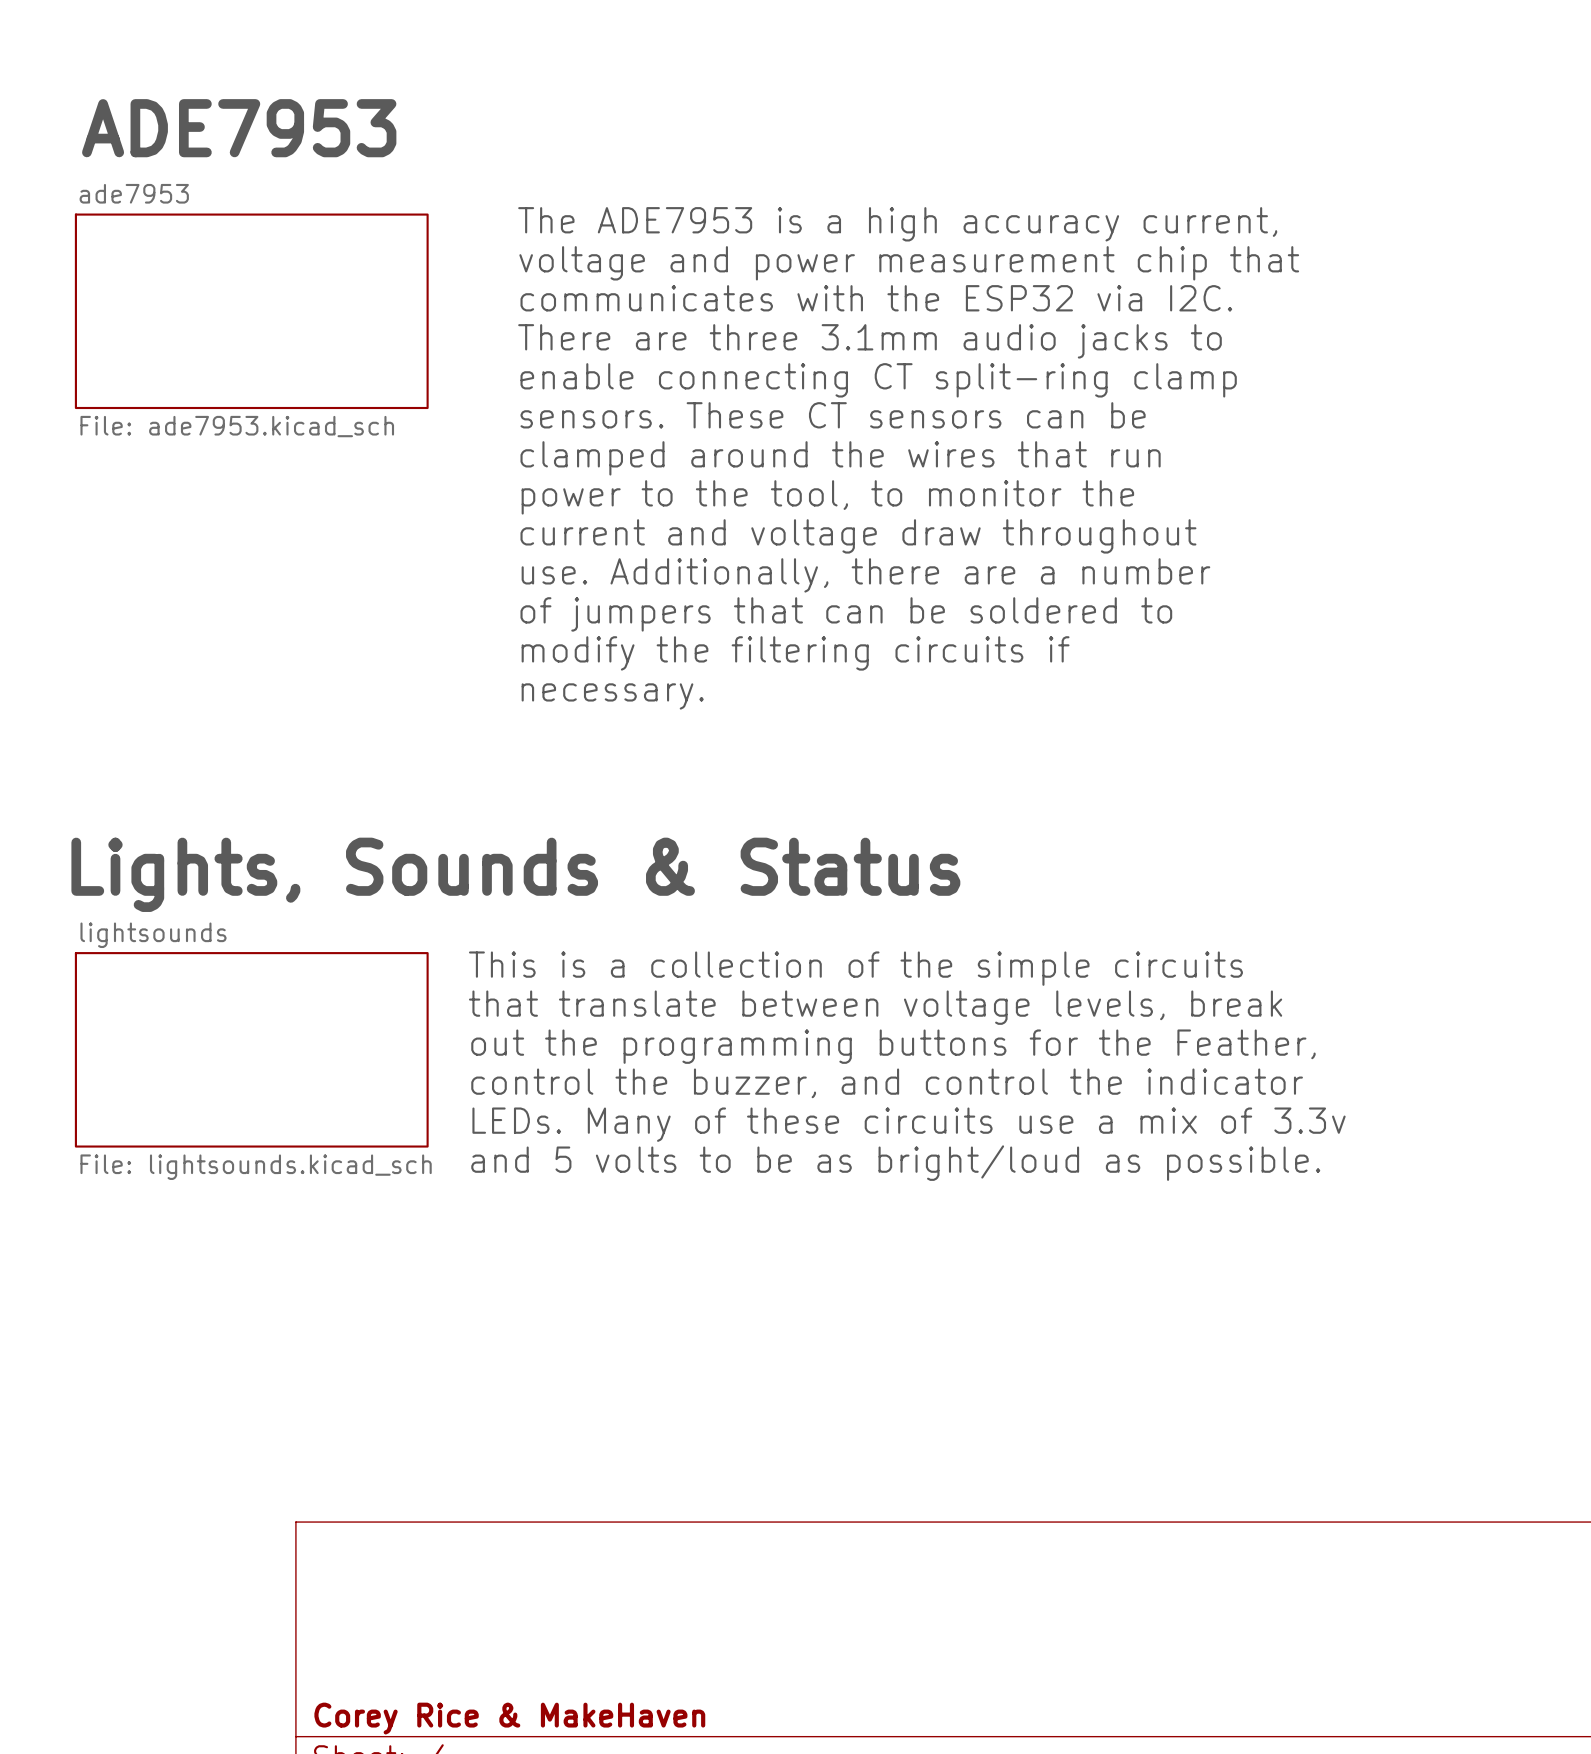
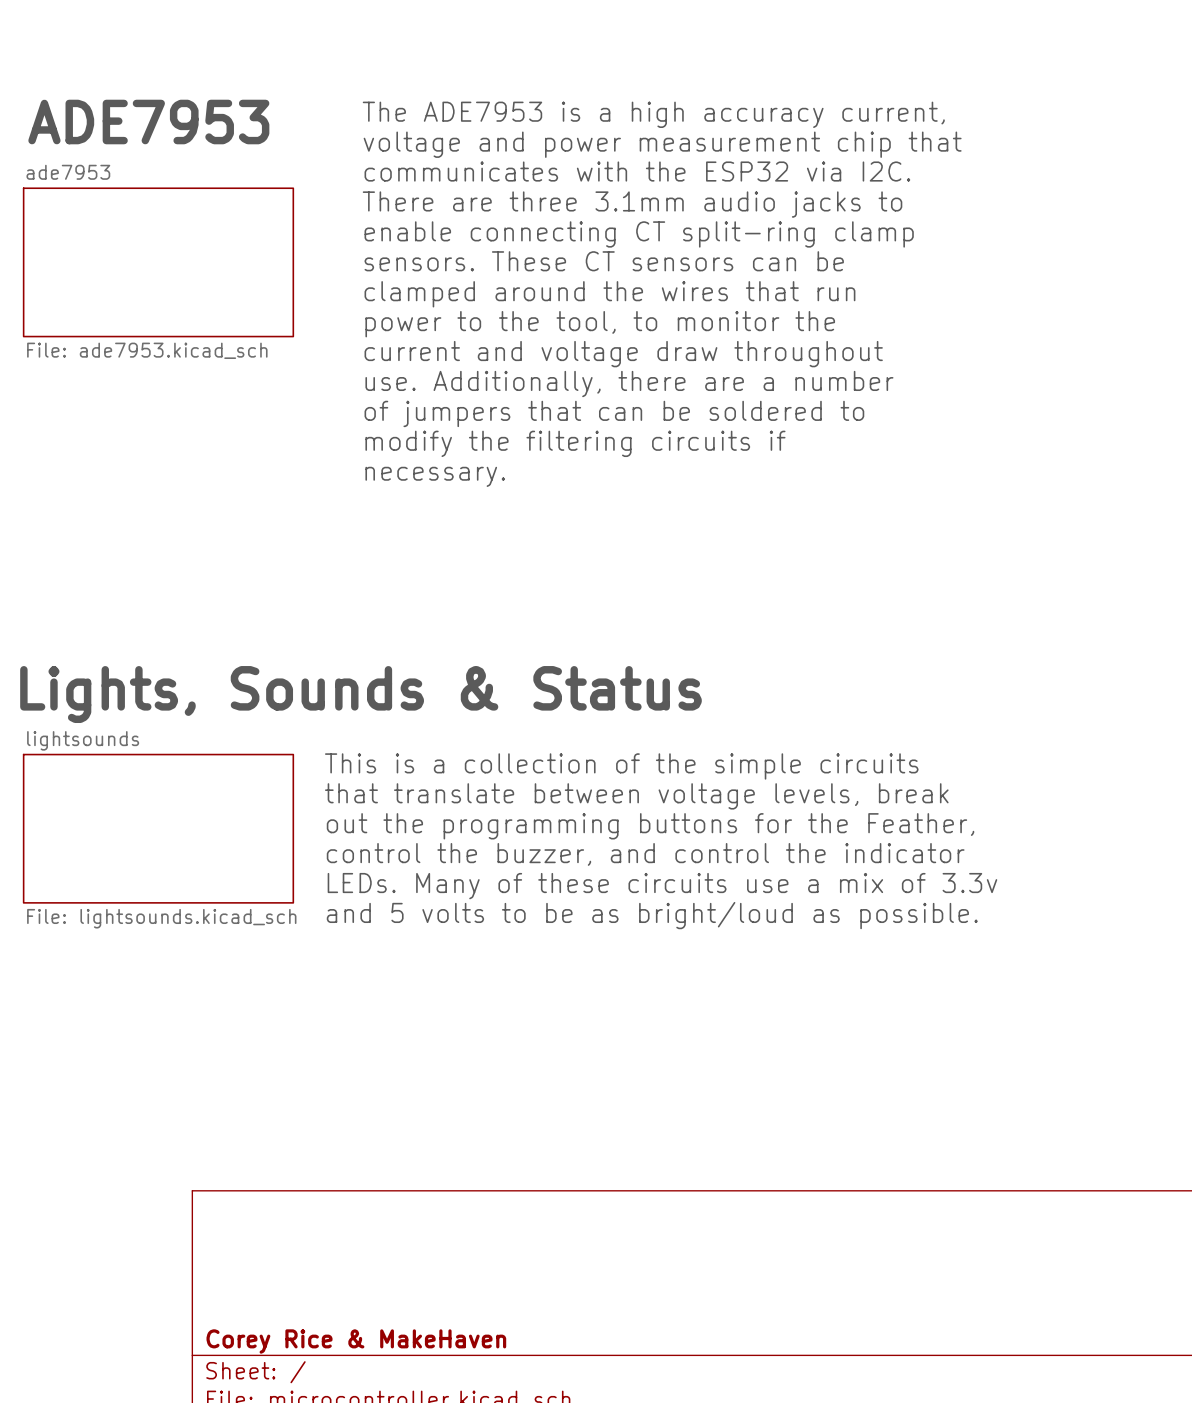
text position: The ADE7953 is a high accuracy current, (897, 224) -> The ADE7953 is a high accuracy current, (653, 114)
text position: voltage and power measurement chip that (909, 263) -> voltage and power measurement chip that (662, 144)
text position: communicates with the ESP32 via I2C. (876, 298) -> communicates with the ESP32 via I2C. (637, 171)
text position: There are three 3.1mm audio jacks to (869, 341) -> There are three 3.1mm audio jacks to (632, 204)
text position: enable connecting CT split-ring clamp (878, 380) -> enable connecting CT split-ring clamp (639, 234)
text position: sensors. These CT sensors can be (833, 415) -> sensors. These CT sensors can be (604, 261)
text position: clamped around the wires that run (840, 458) -> clamped around the wires that run (609, 294)
text position: power to the tool, to monitor the (827, 497) -> power to the tool, to monitor the (600, 324)
text position: current and voltage draw throughout (858, 536) -> current and voltage draw throughout (623, 354)
text position: use. Additionally, there are a number (865, 575) -> use. Additionally, there are a number (629, 384)
text position: of jumpers that can be soldered to (846, 614) -> of jumpers that can be soldered to (614, 413)
text position: modify the filtering circuits if (795, 653) -> modify the filtering circuits if (575, 443)
text position: necessary. (612, 696) -> necessary. (435, 476)

